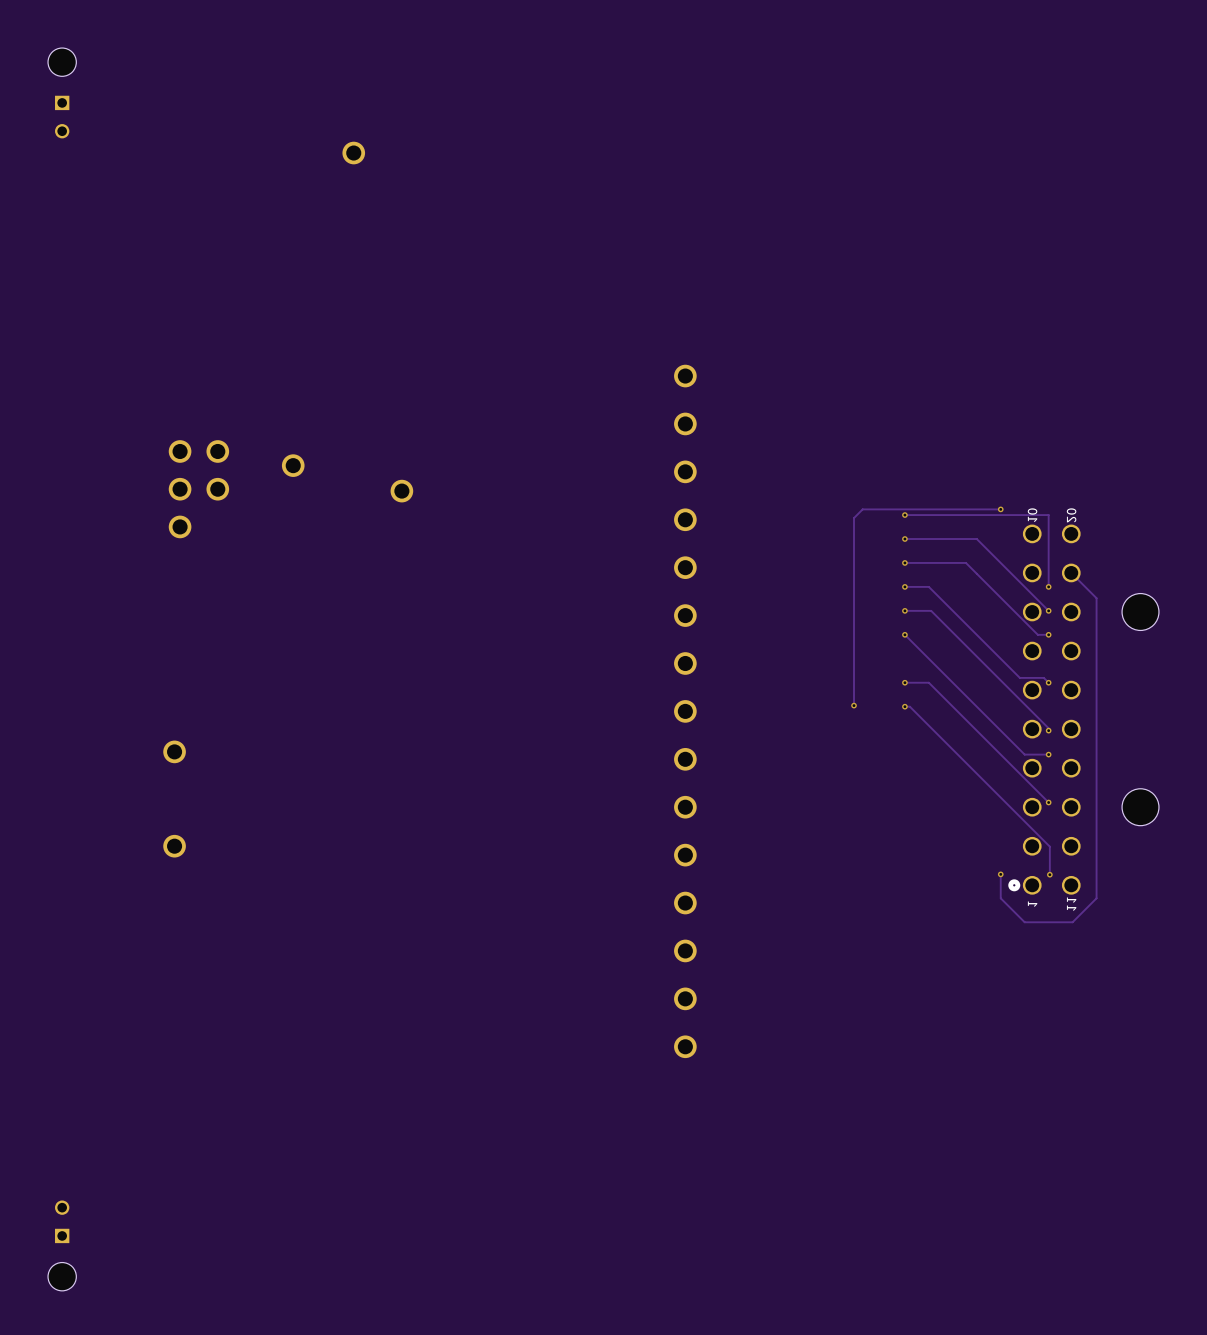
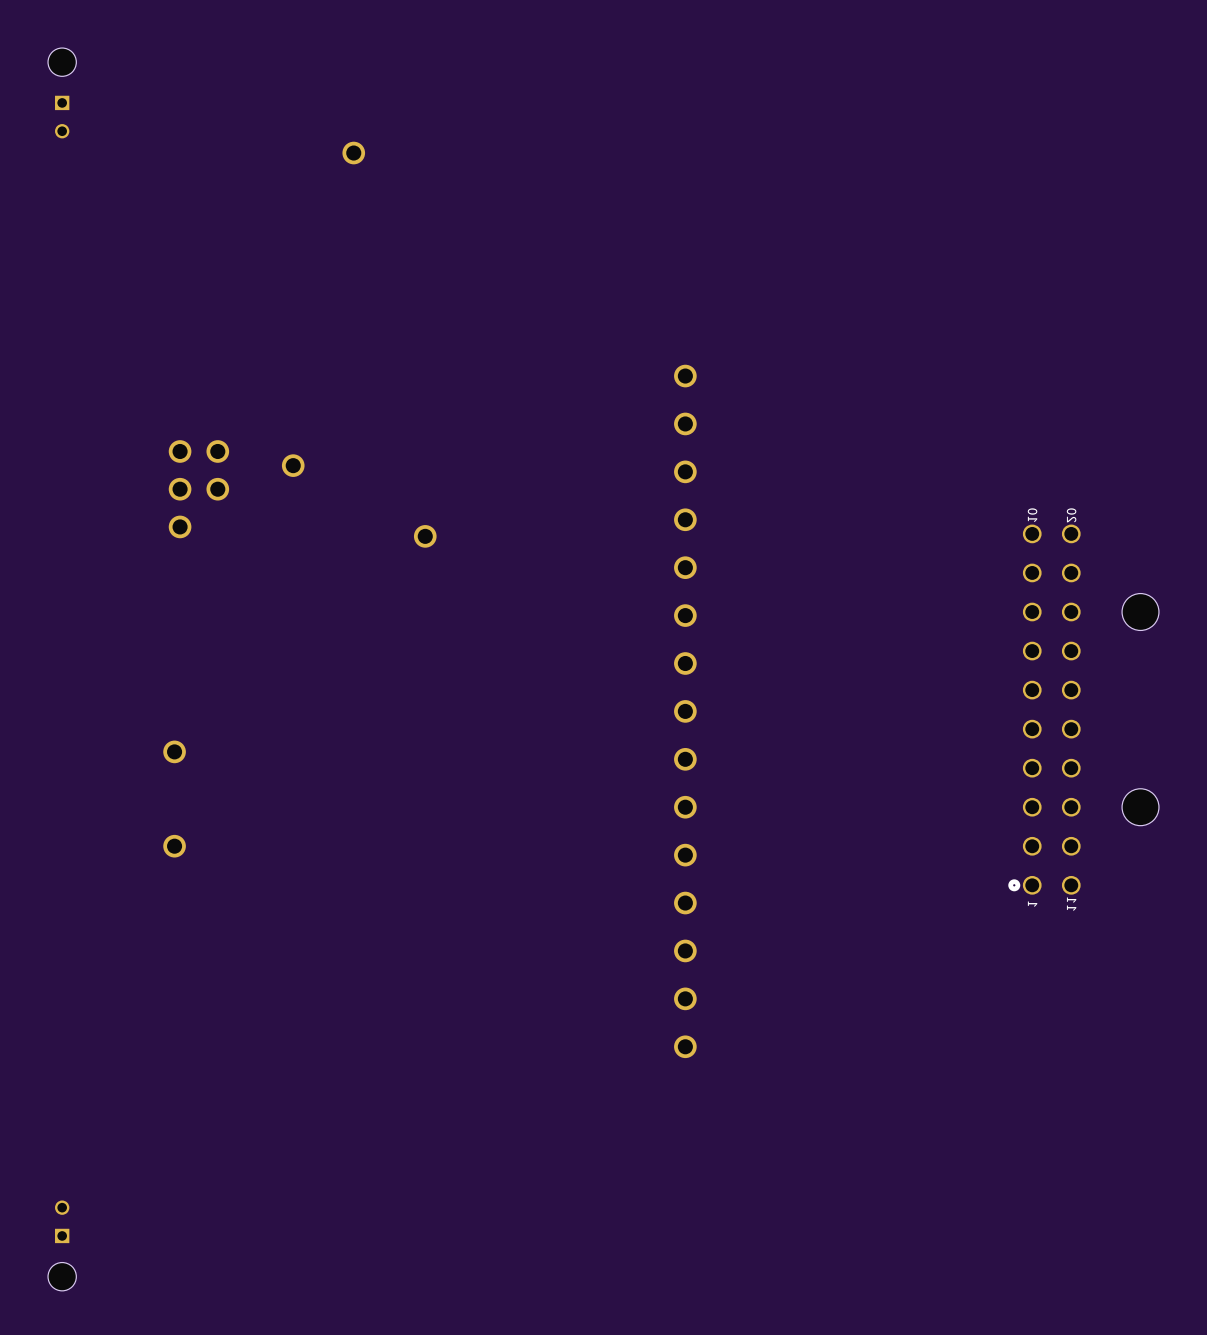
part position: (401, 491) -> (425, 536)
track: (1000, 509) (862, 509) (854, 518) (854, 705) -> none
via: (1000, 509) -> none
track: (904, 515) (1048, 515) (1048, 586) -> none
via: (904, 515) -> none
track: (904, 539) (976, 539) (1048, 610) -> none
via: (904, 539) -> none
track: (904, 562) (965, 562) (1037, 634) (1048, 634) -> none
via: (904, 562) -> none
track: (1071, 572) (1096, 598) (1096, 898) (1072, 922) (1024, 922) (1000, 898) (1000, 874) -> none
track: (904, 586) (928, 586) (1019, 677) (1043, 677) (1048, 682) -> none
via: (904, 586) -> none
via: (1048, 586) -> none
track: (904, 610) (931, 610) (1048, 728) (1048, 730) -> none
via: (904, 610) -> none
via: (1048, 610) -> none
track: (904, 634) (1024, 754) (1048, 754) -> none
via: (904, 634) -> none
via: (1048, 634) -> none
track: (904, 682) (928, 682) (1048, 802) -> none
via: (904, 682) -> none
via: (1048, 682) -> none
via: (854, 705) -> none
track: (904, 706) (909, 706) (1049, 846) (1049, 874) -> none
via: (904, 706) -> none
via: (1048, 730) -> none
via: (1048, 754) -> none
via: (1048, 802) -> none
via: (1000, 874) -> none
via: (1049, 874) -> none

